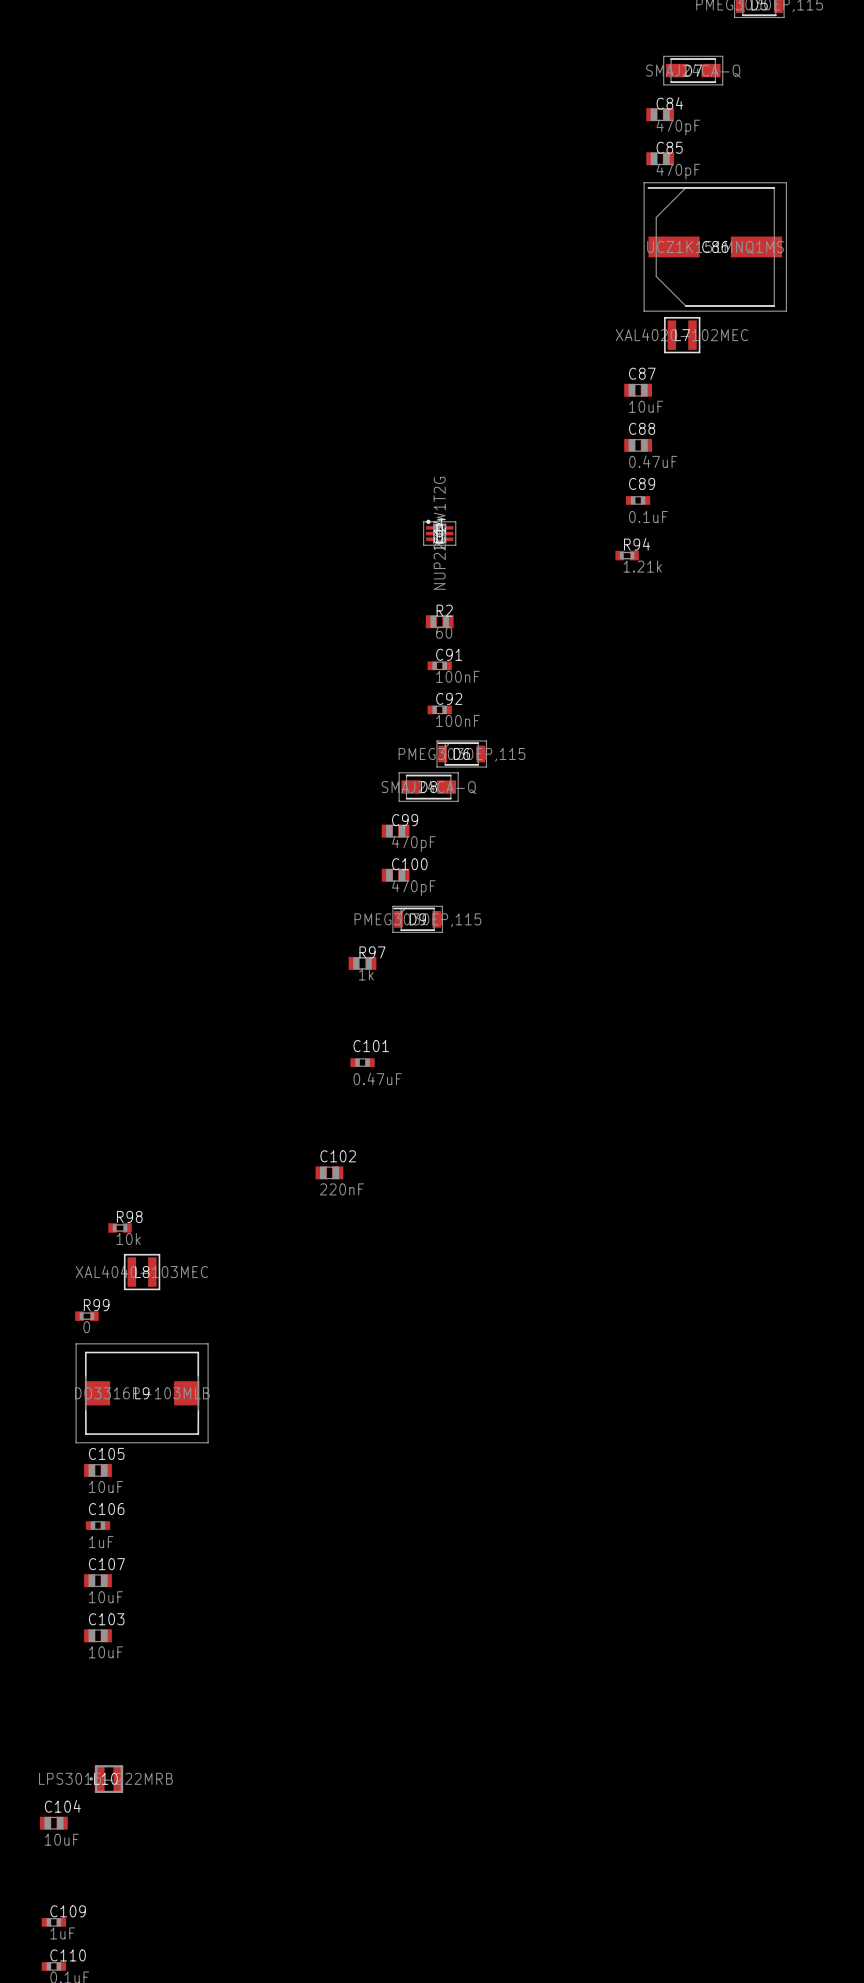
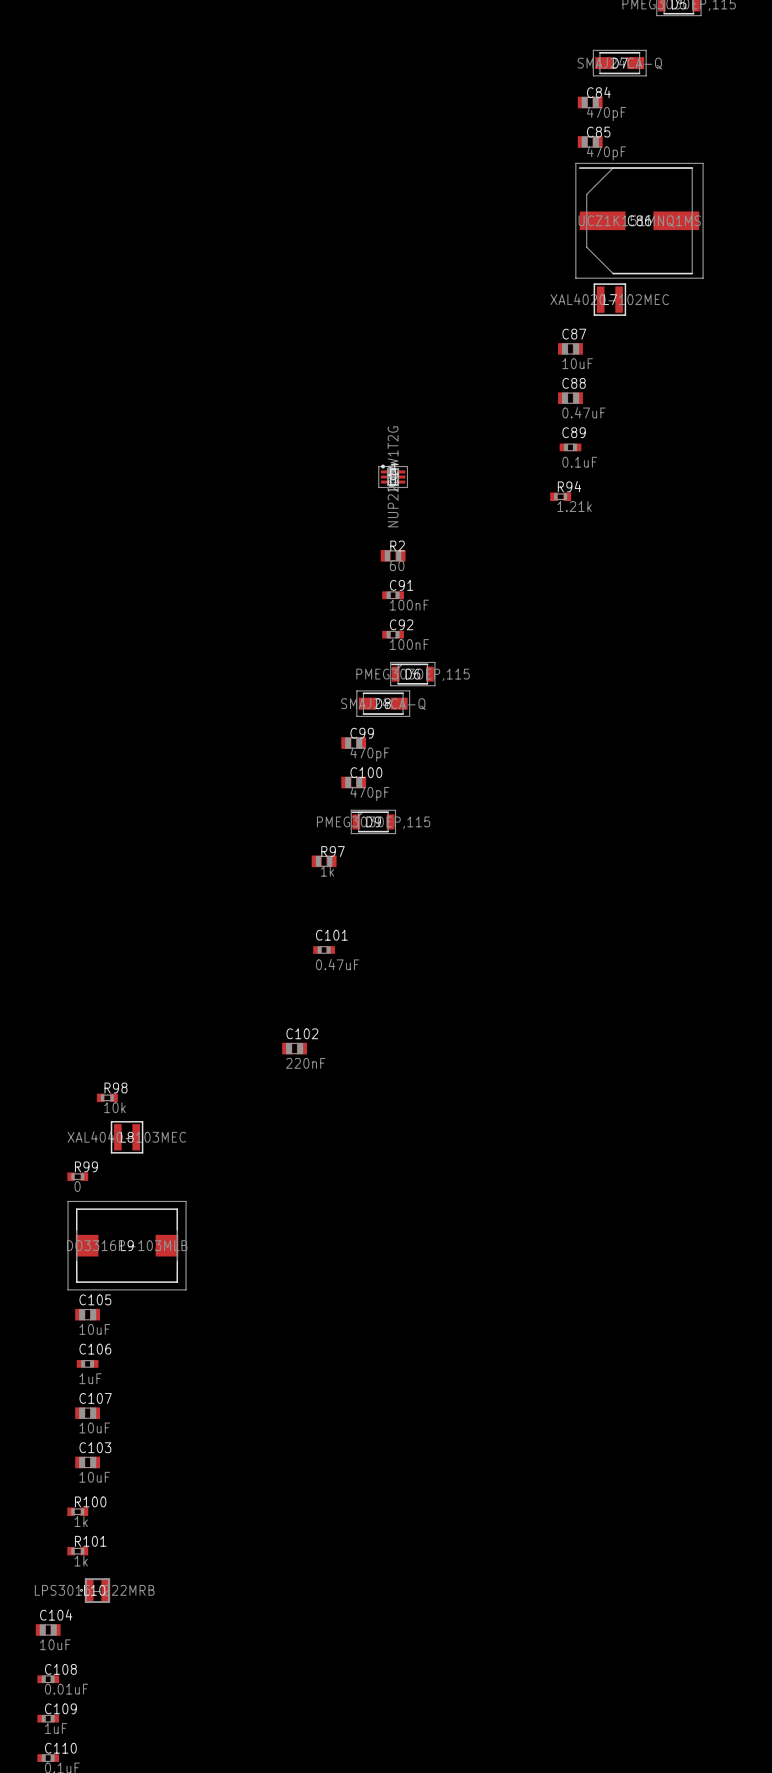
R100: none -> 1k (77, 1511)
R101: none -> 1k (77, 1551)
C108: none -> 0.01uF (48, 1679)

